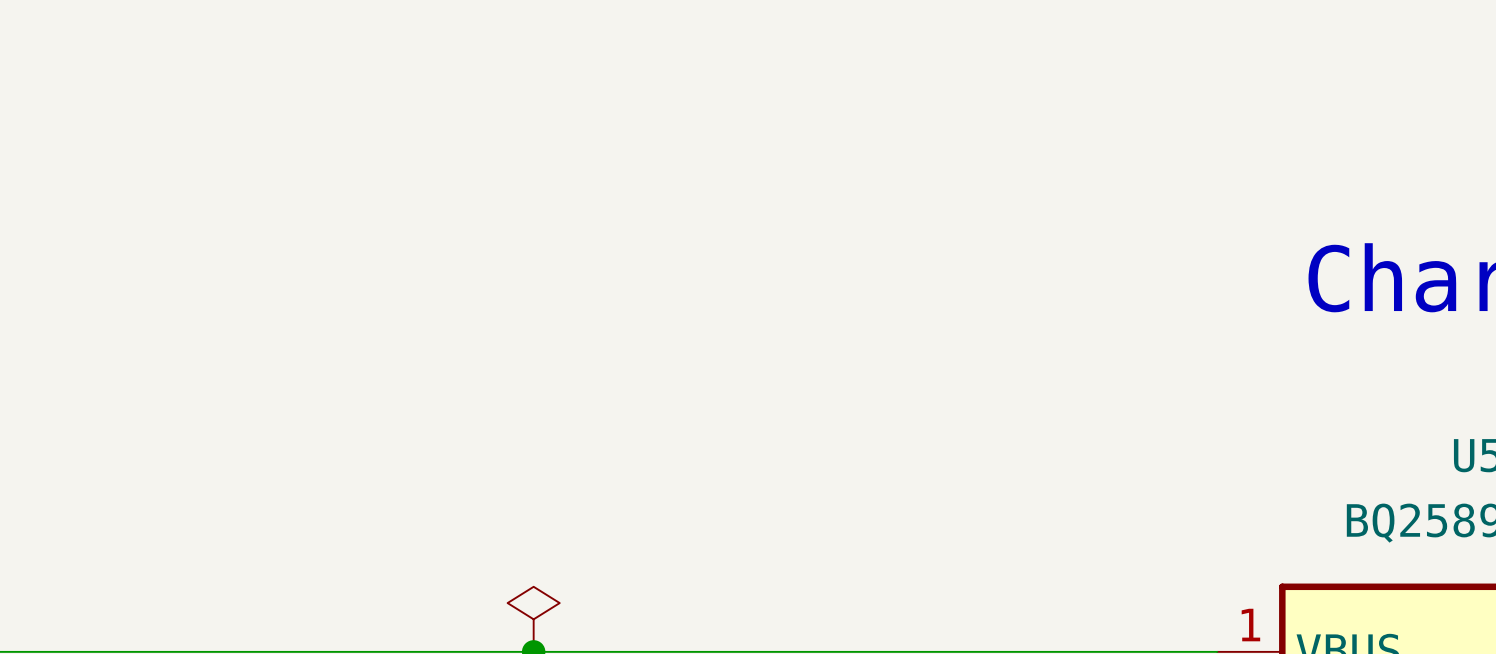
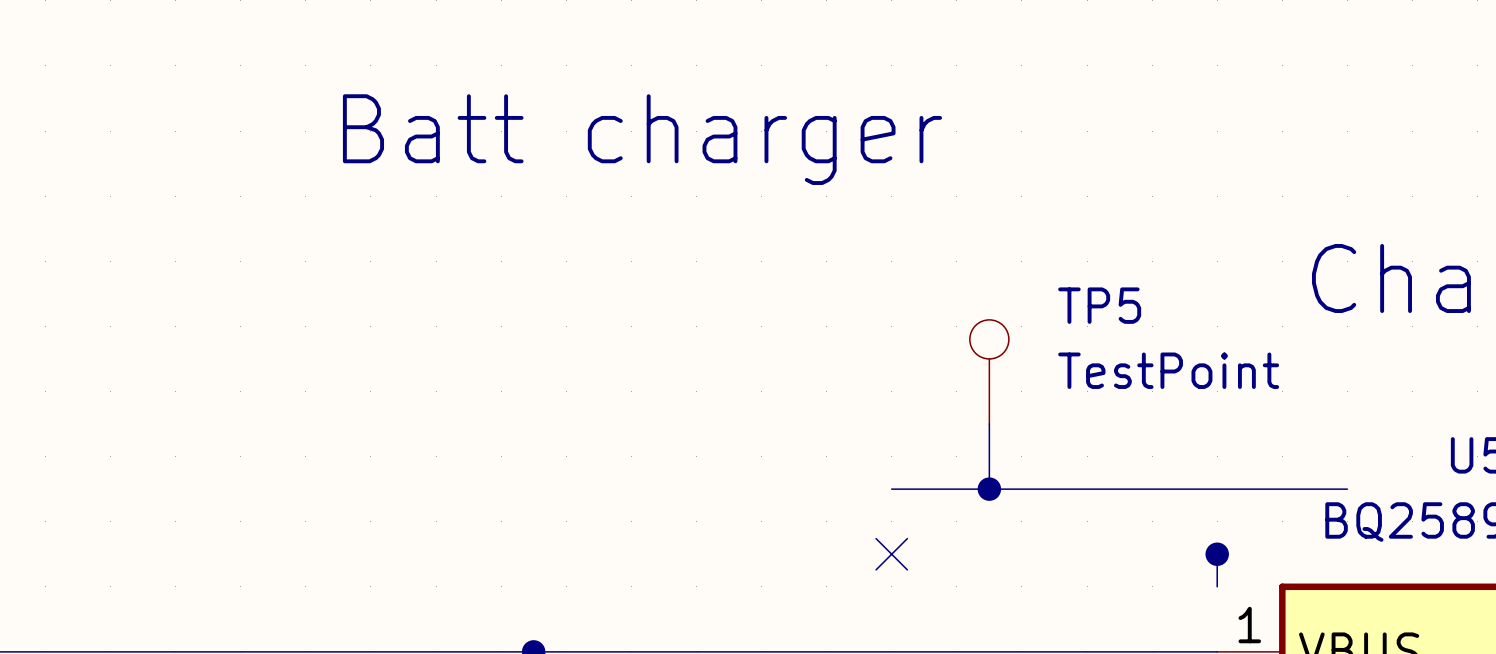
text: none -> Batt charger (642, 139)
TP5: none -> TestPoint (989, 371)
wire: none -> (989, 424) (989, 489)
wire: none -> (891, 489) (1347, 489)
junction: none -> (989, 489)
no-connect mark: none -> (891, 554)
wire: none -> (1217, 554) (1217, 586)
junction: none -> (1217, 554)
power symbol: (533, 619) -> none

